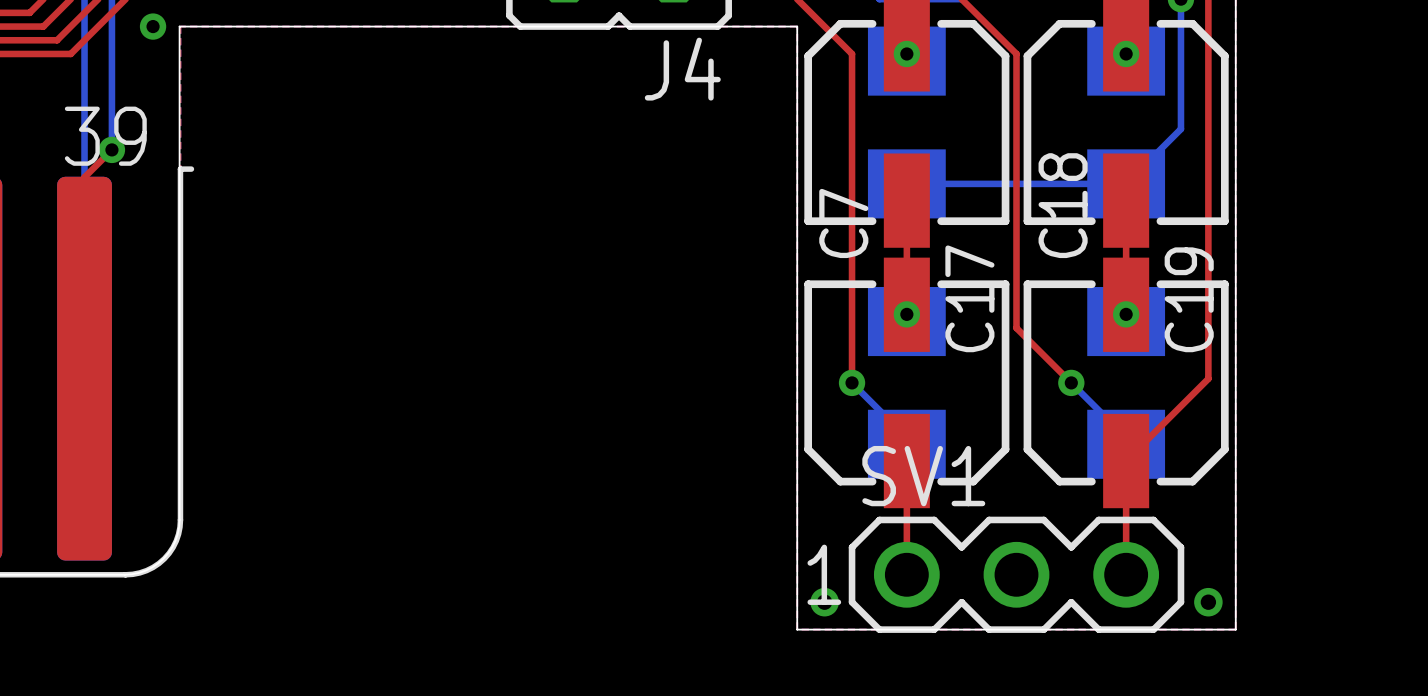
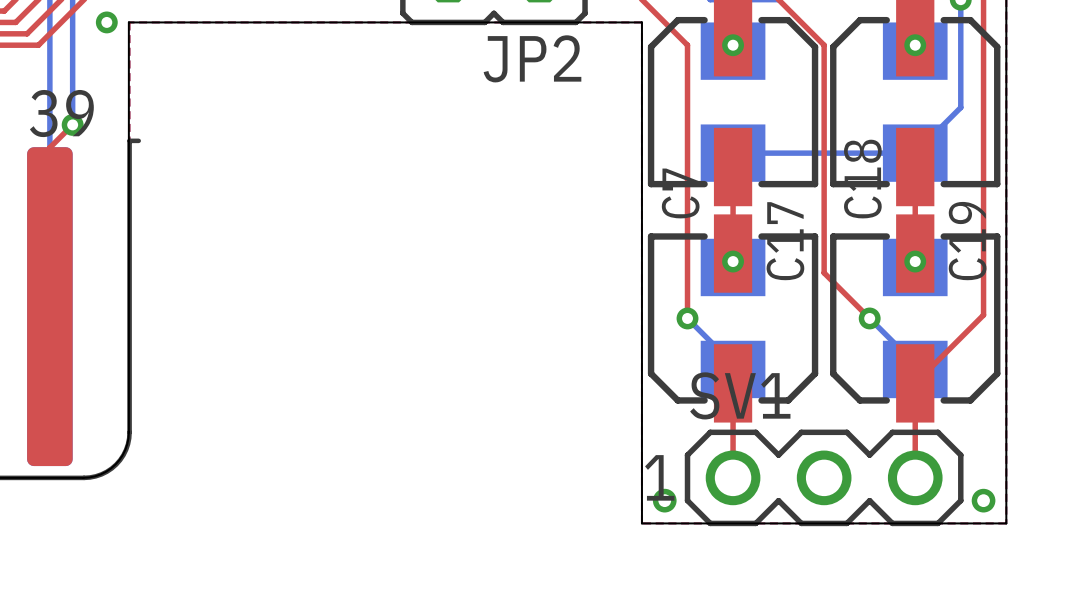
J4 name: J4 (682, 69) -> JP2 (532, 58)

